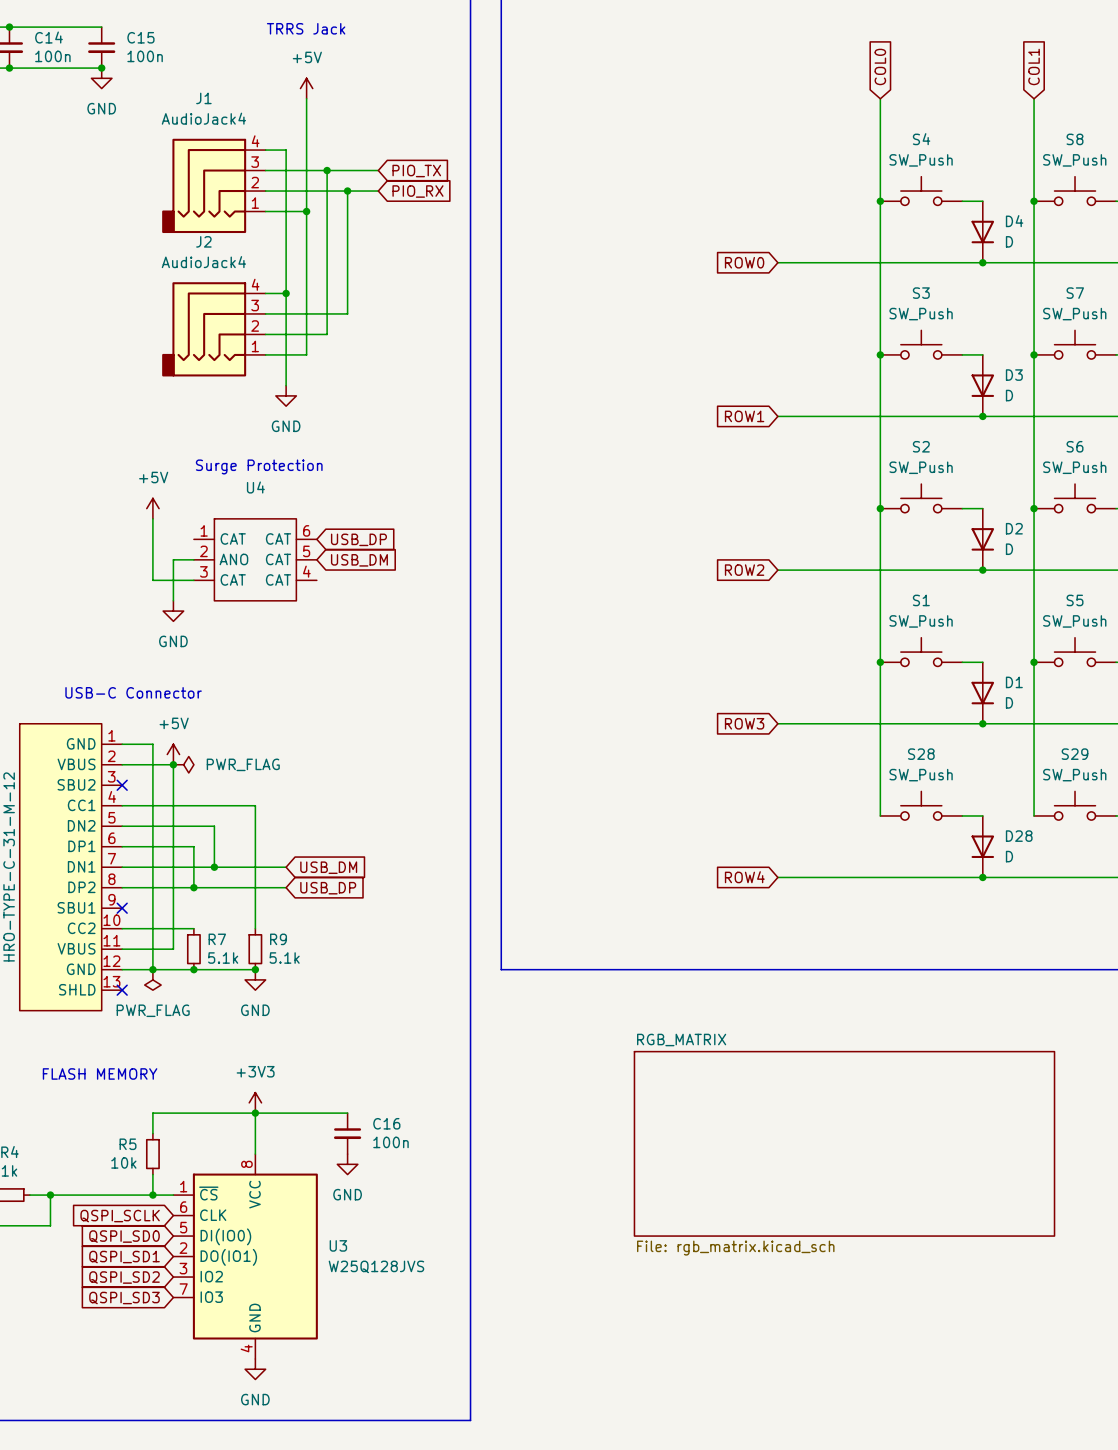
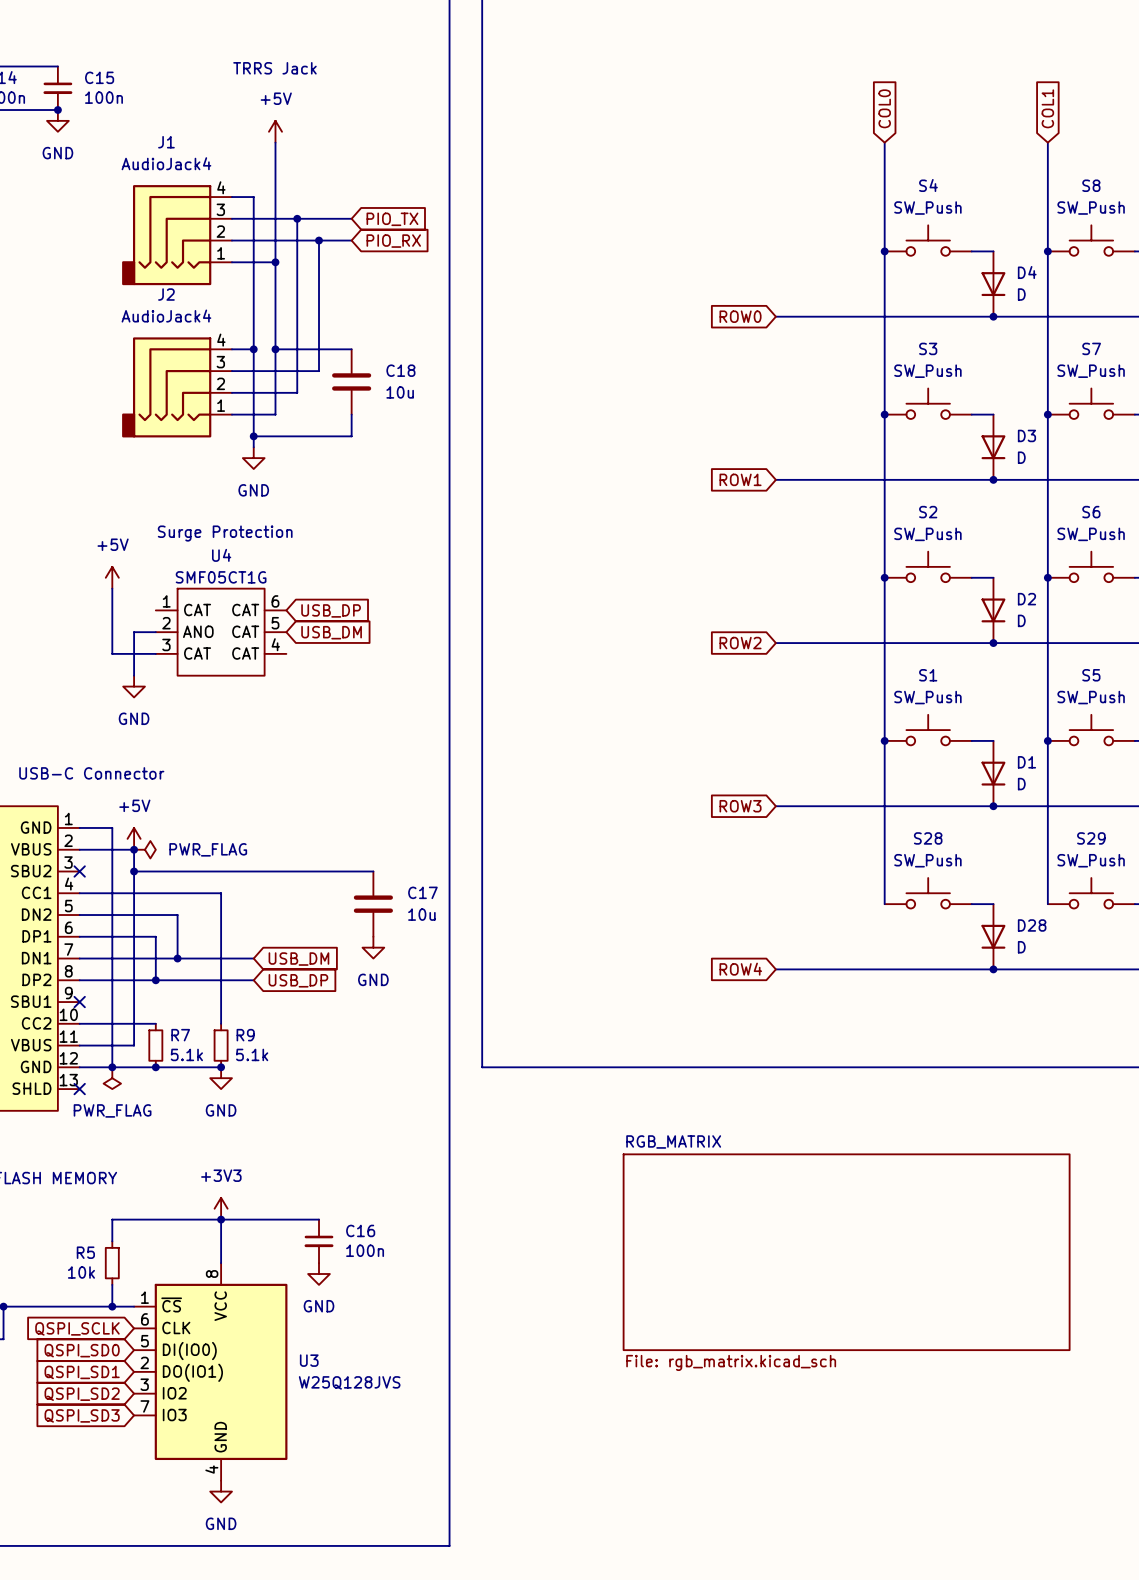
wire: none -> (275, 349) (351, 349)
junction: none -> (275, 349)
C18: none -> 10u (351, 381)
wire: none -> (351, 414) (351, 436) (253, 436)
junction: none -> (253, 436)
U4 value: none -> SMF05CT1G (221, 577)
wire: none -> (134, 871) (373, 871)
junction: none -> (134, 871)
C17: none -> 10u (373, 904)
power symbol: none -> GND (373, 947)

